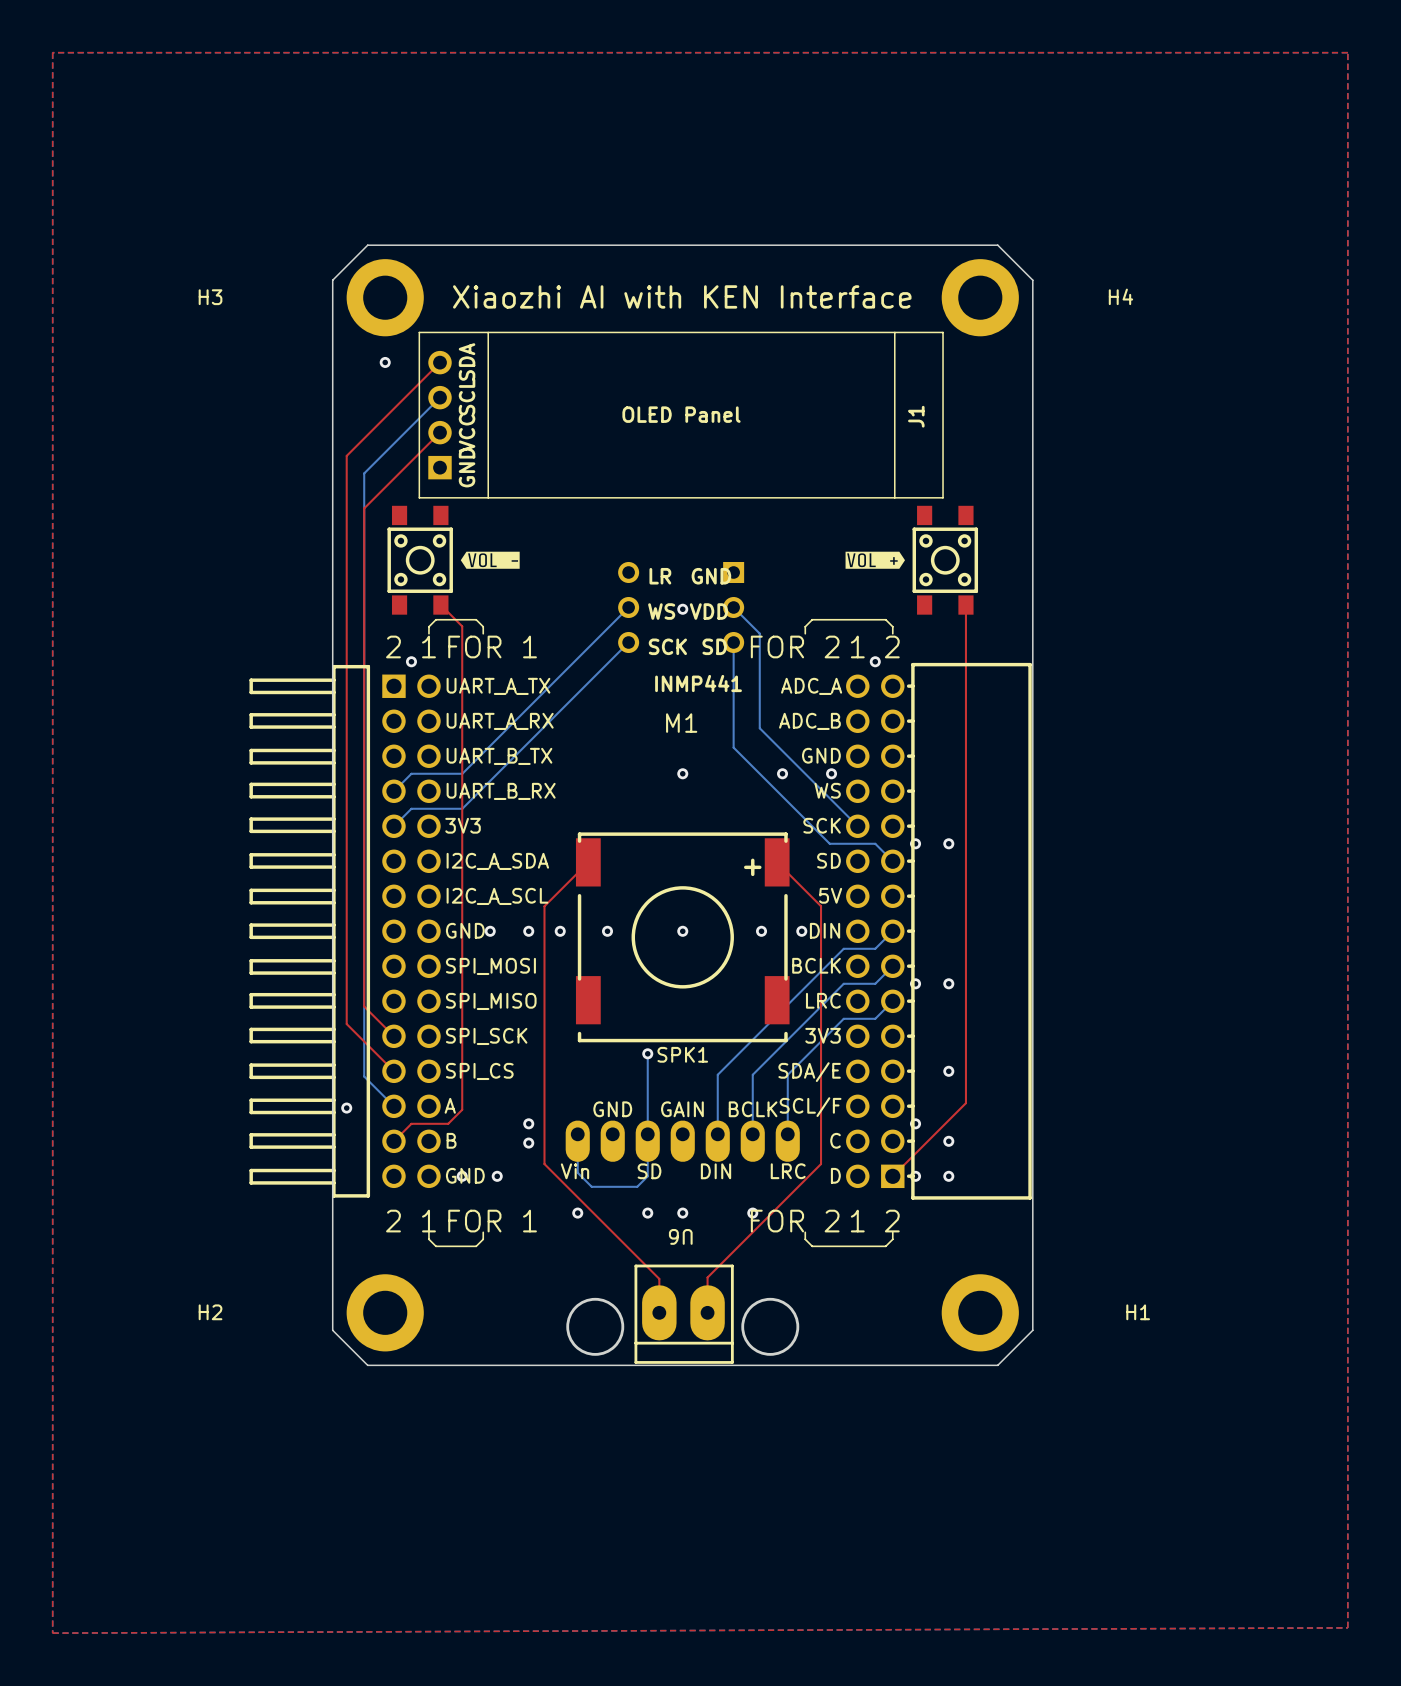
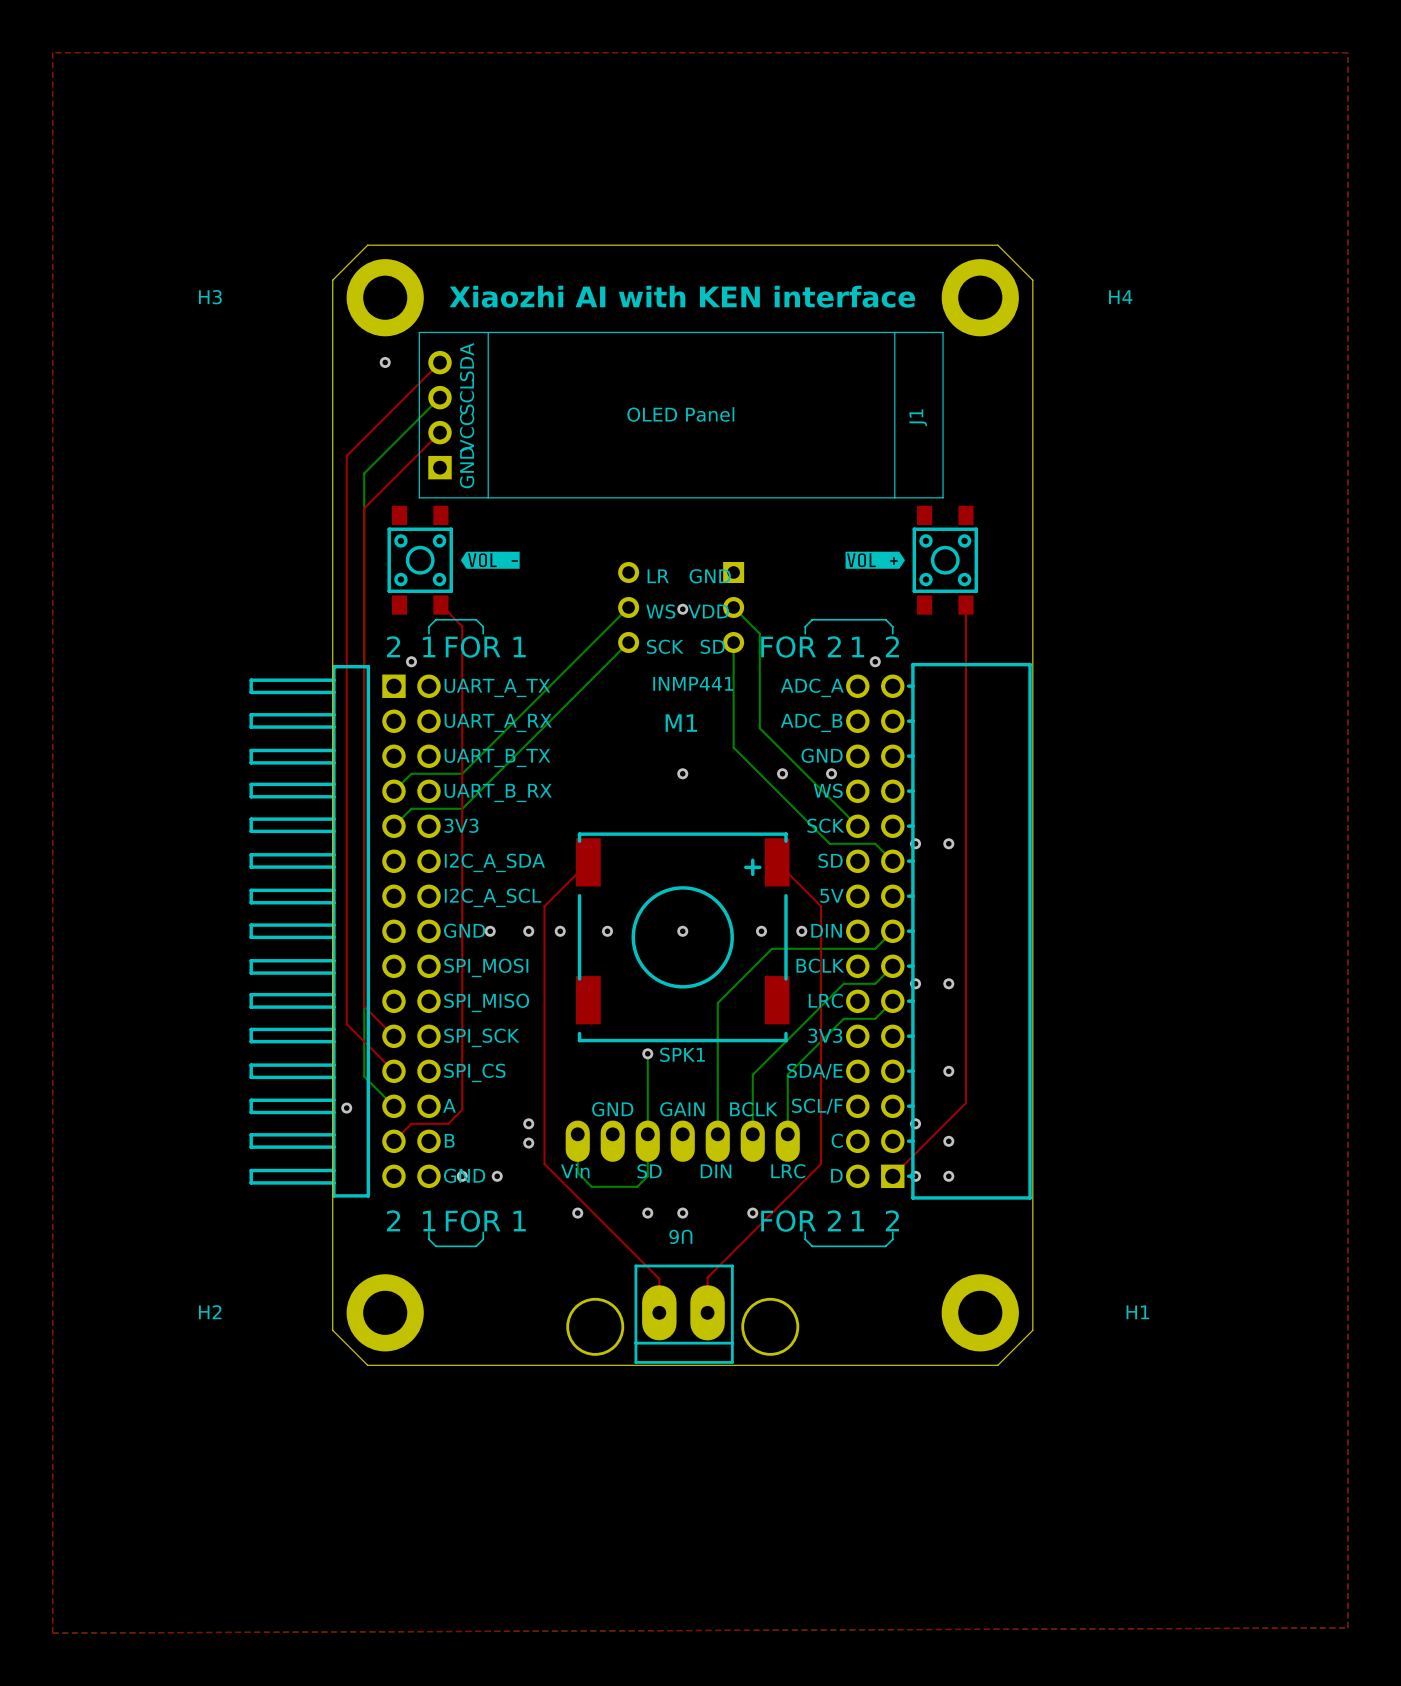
text: Xiaozhi AI with KEN Interface (682, 296) -> Xiaozhi AI with KEN interface (682, 296)
bottom track: (843, 948) (717, 1074) -> (843, 948) (772, 948) (717, 1003) (717, 1074)

